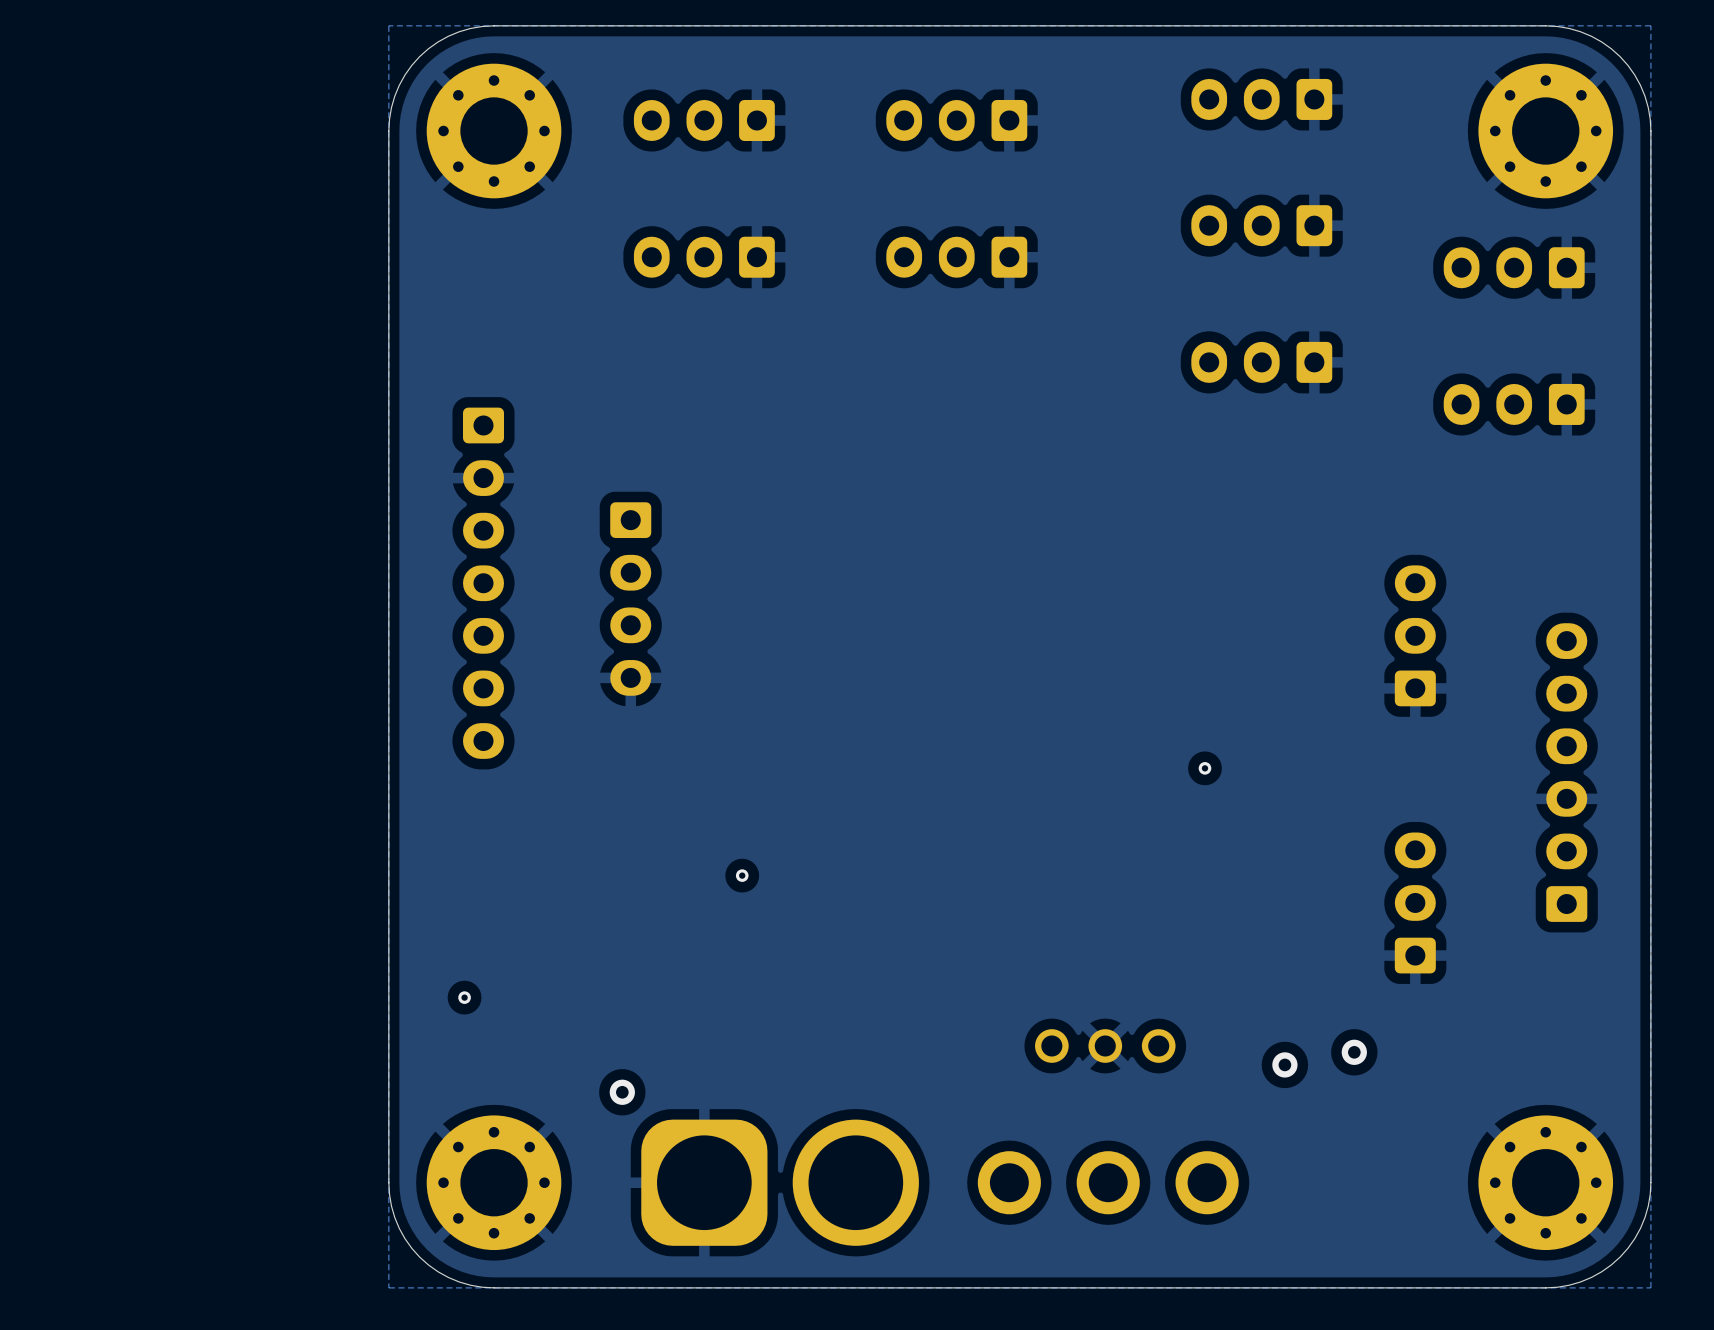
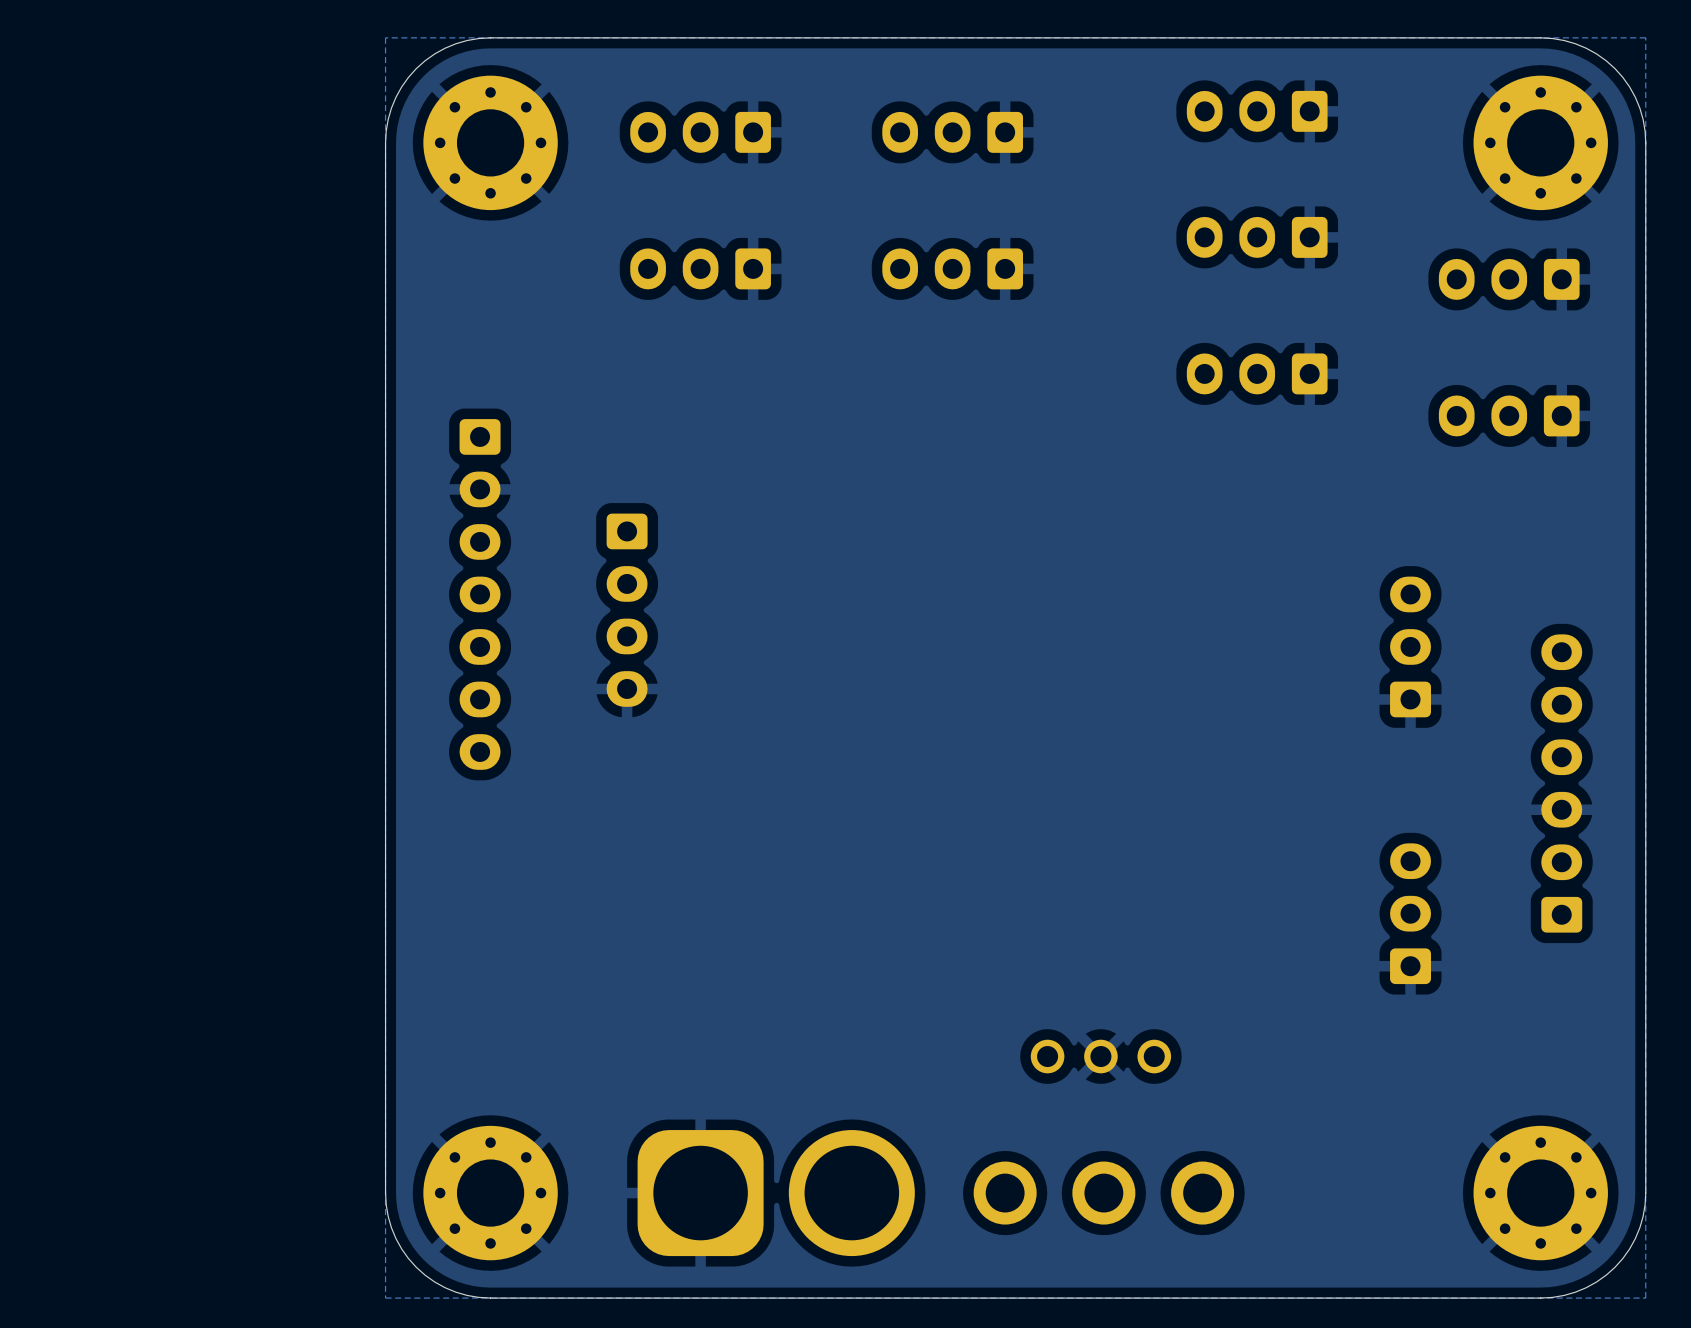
via: (1204, 768) -> none
via: (742, 875) -> none
via: (464, 997) -> none
via: (1354, 1052) -> none
via: (1284, 1064) -> none
via: (622, 1092) -> none

